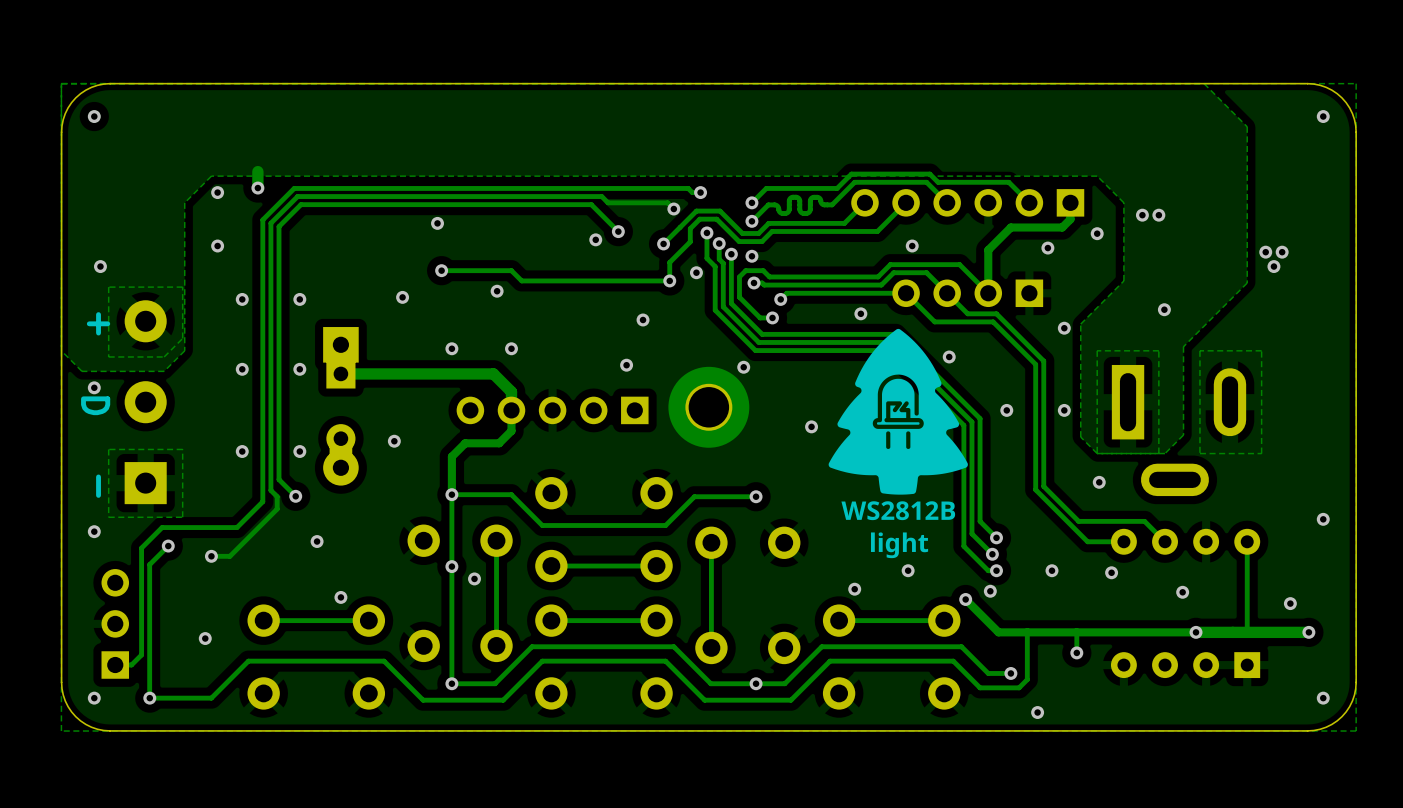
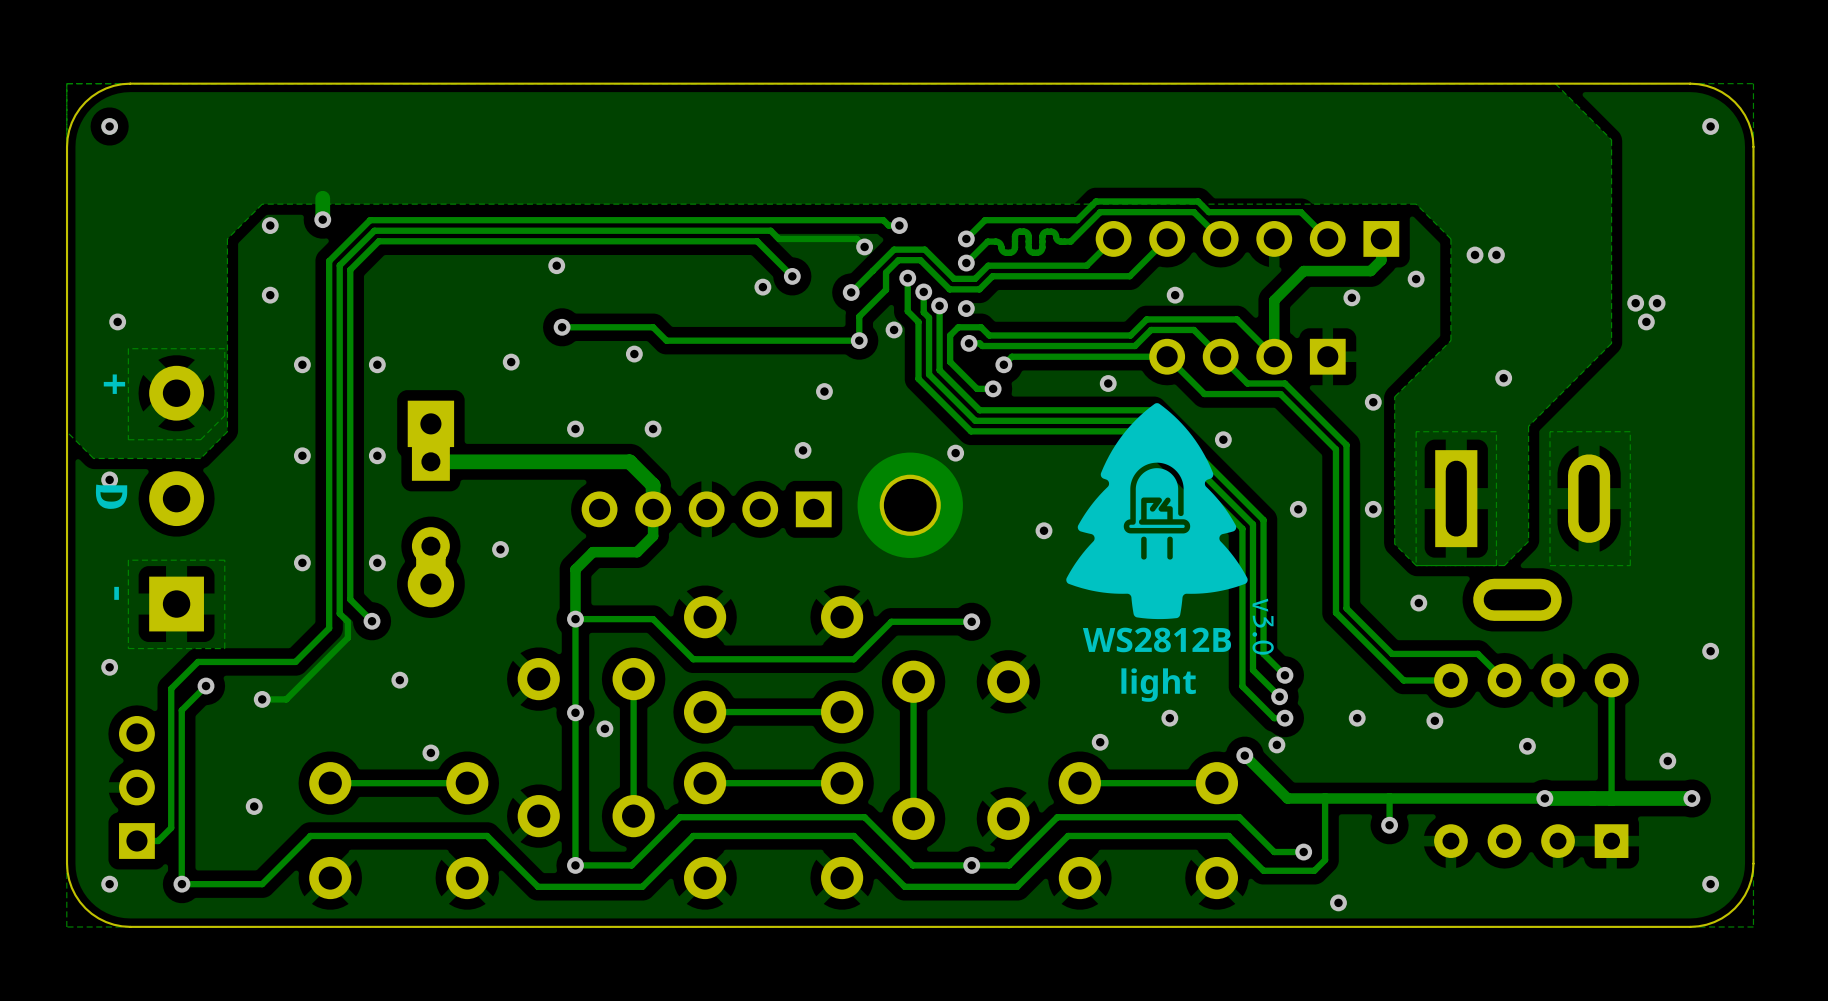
text: none -> v3.0 (1263, 626)

